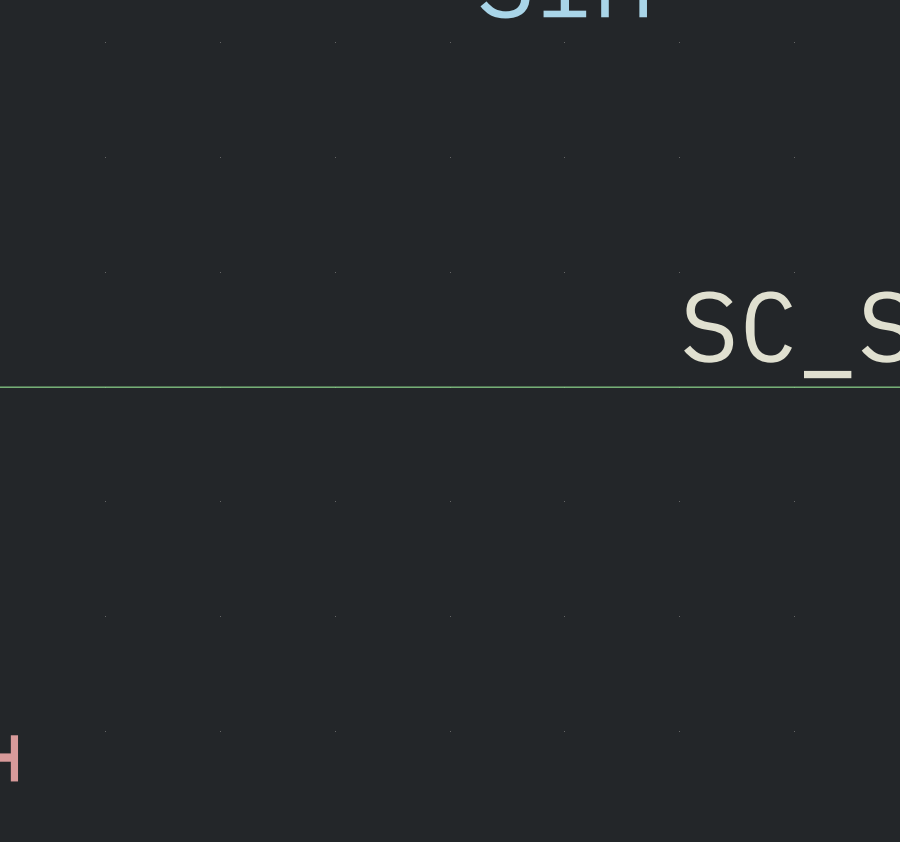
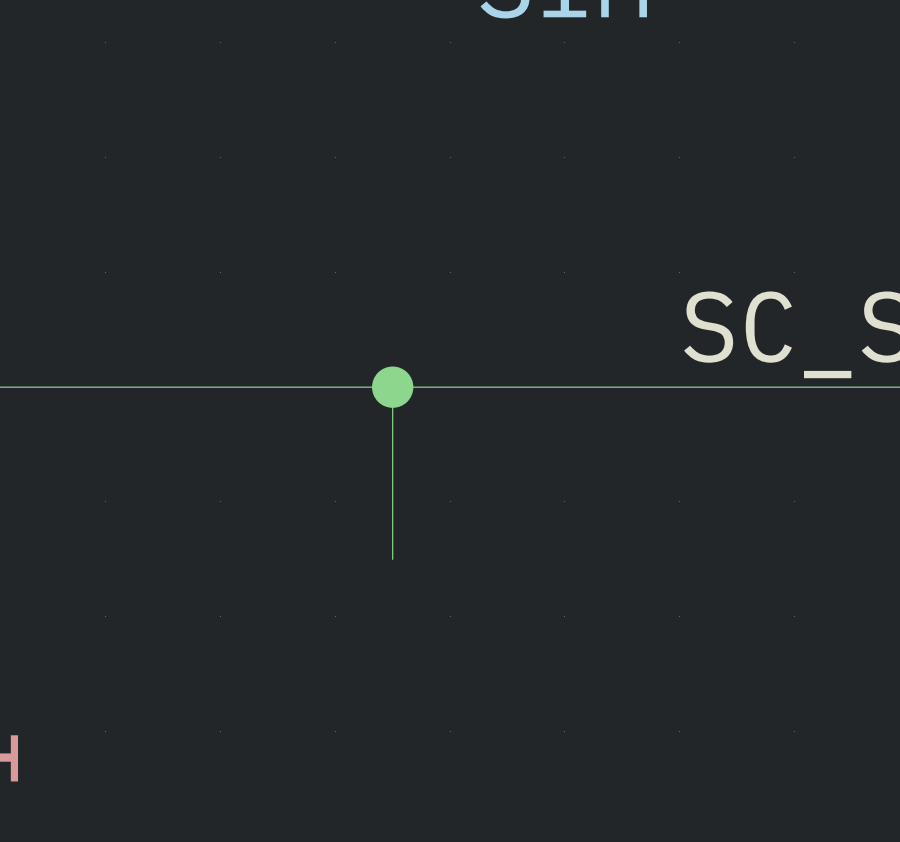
wire: none -> (392, 387) (392, 559)
junction: none -> (392, 387)

